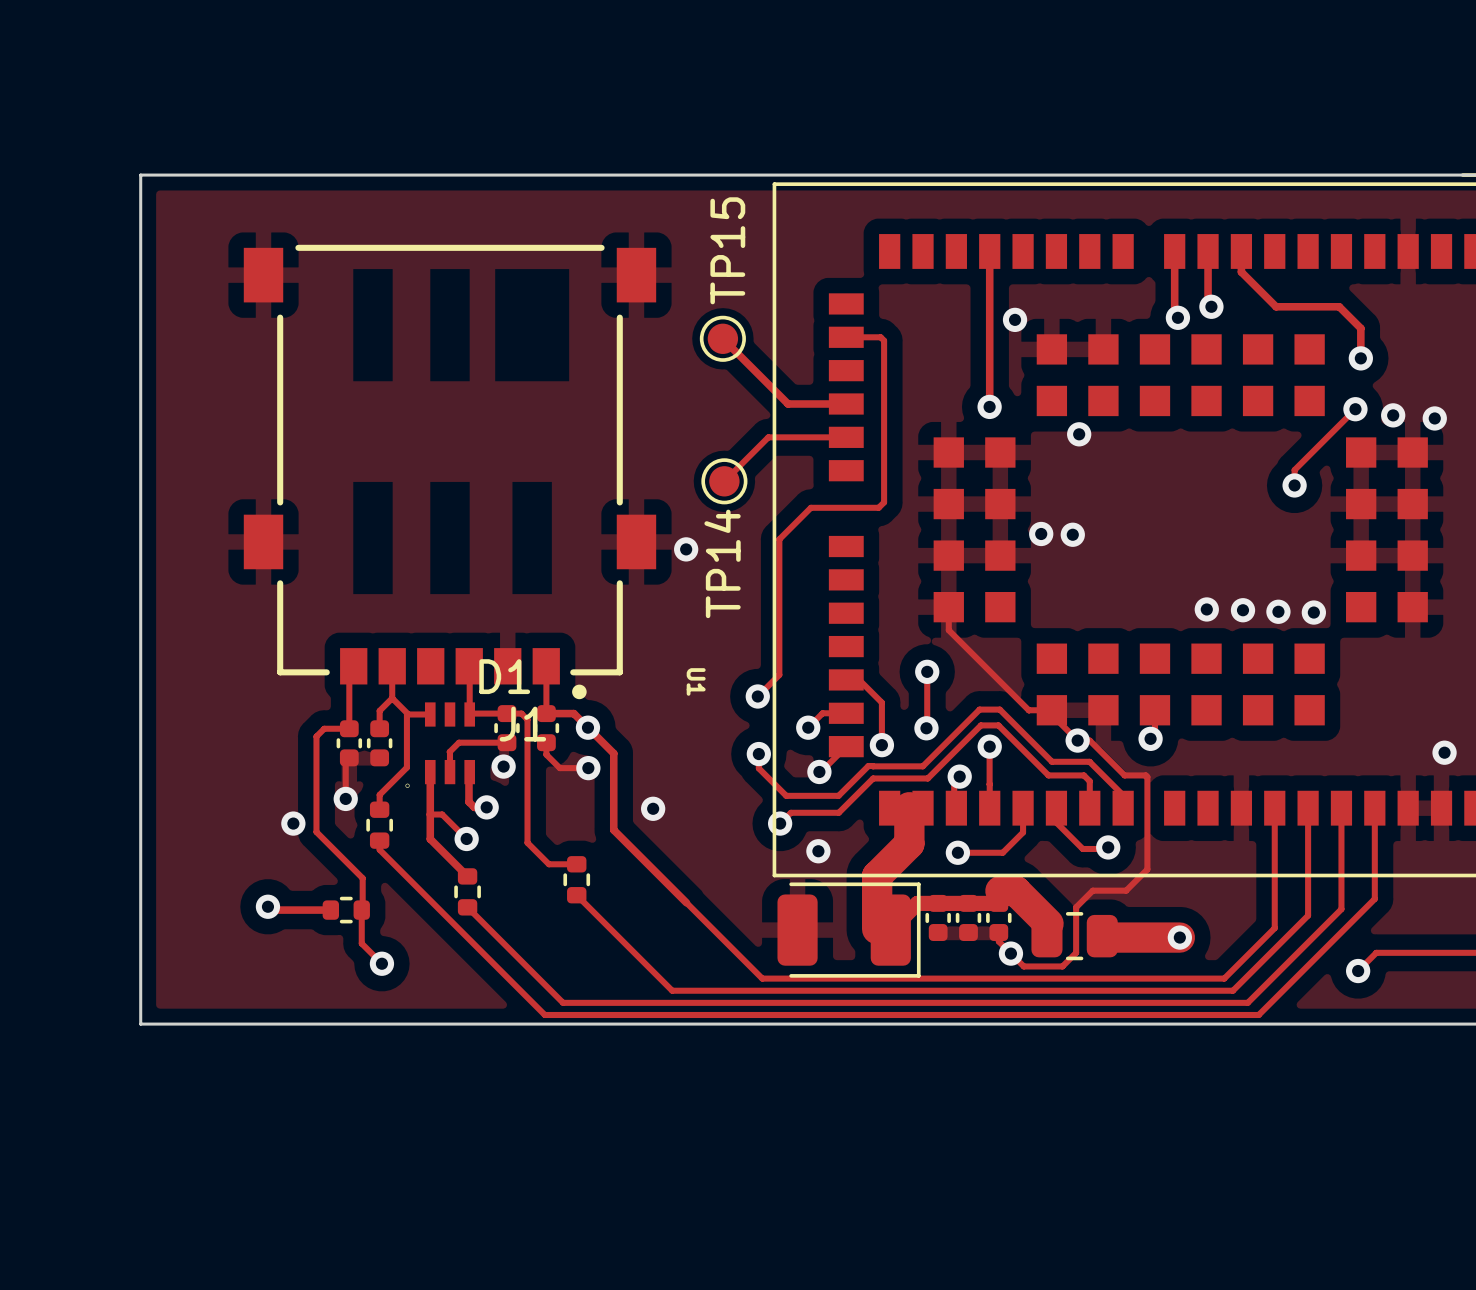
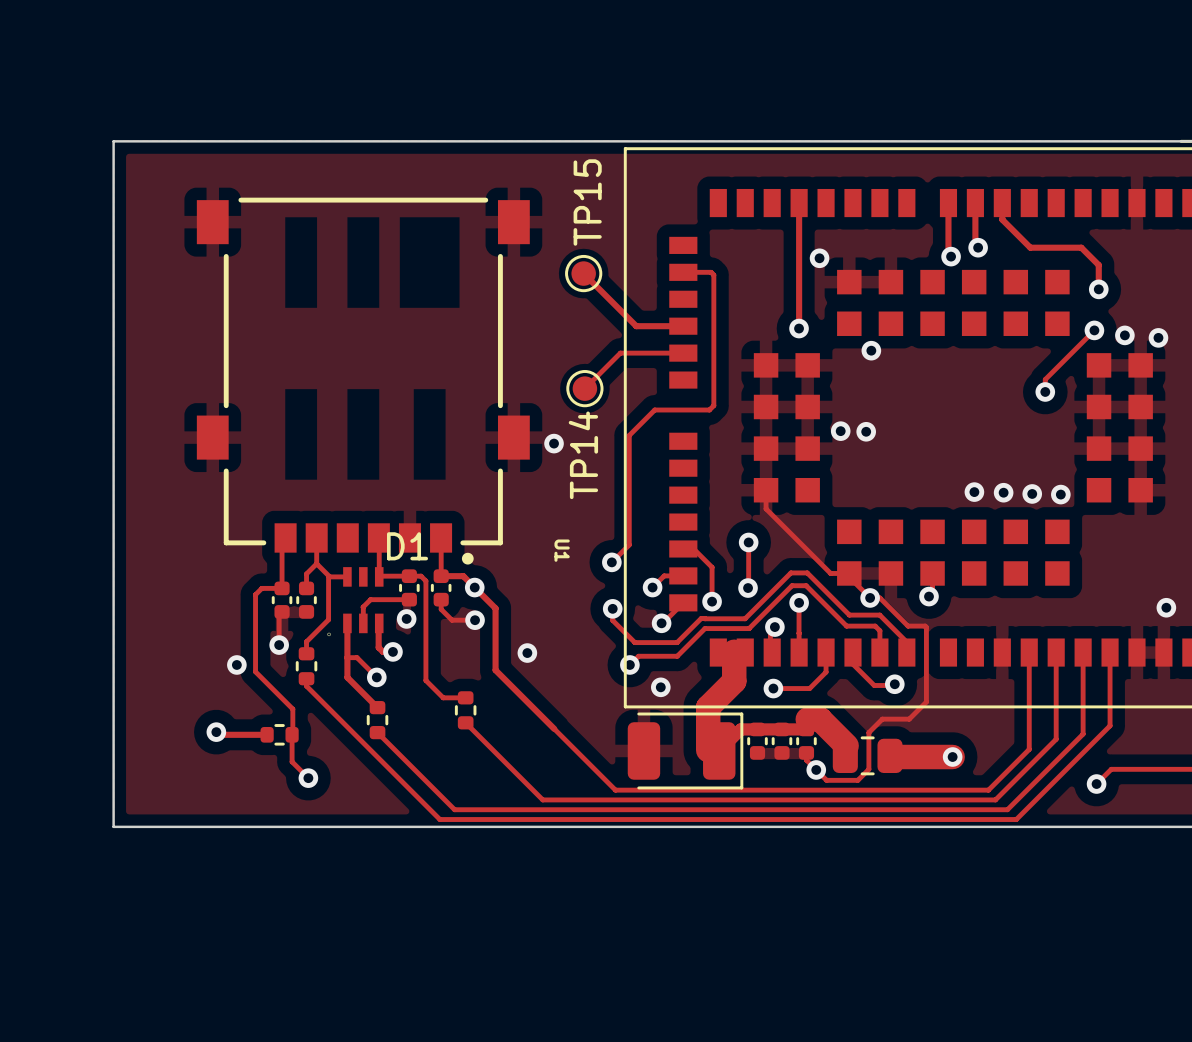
J1 name: J1 (522, 724) -> none

